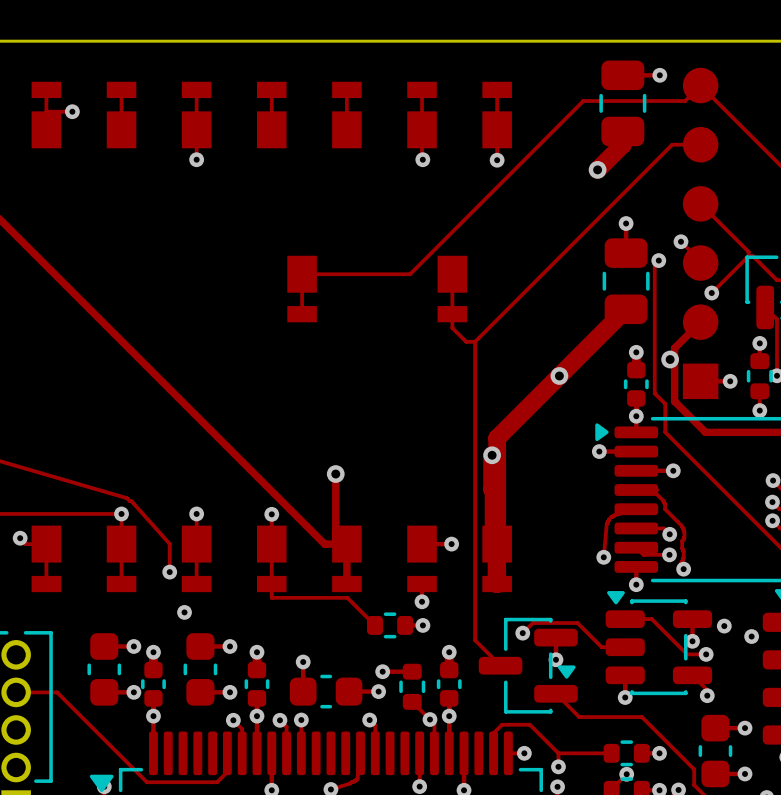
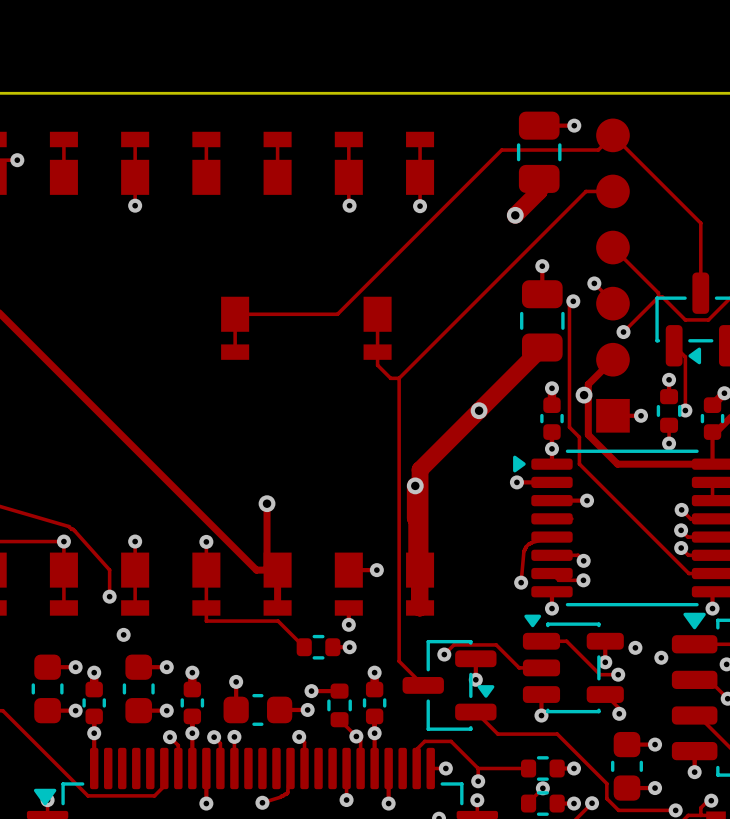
track: (647, 490) (654, 492) (663, 501) (665, 509) (683, 529) (683, 558) (680, 563) (683, 569) -> none
via: (683, 569) -> none

